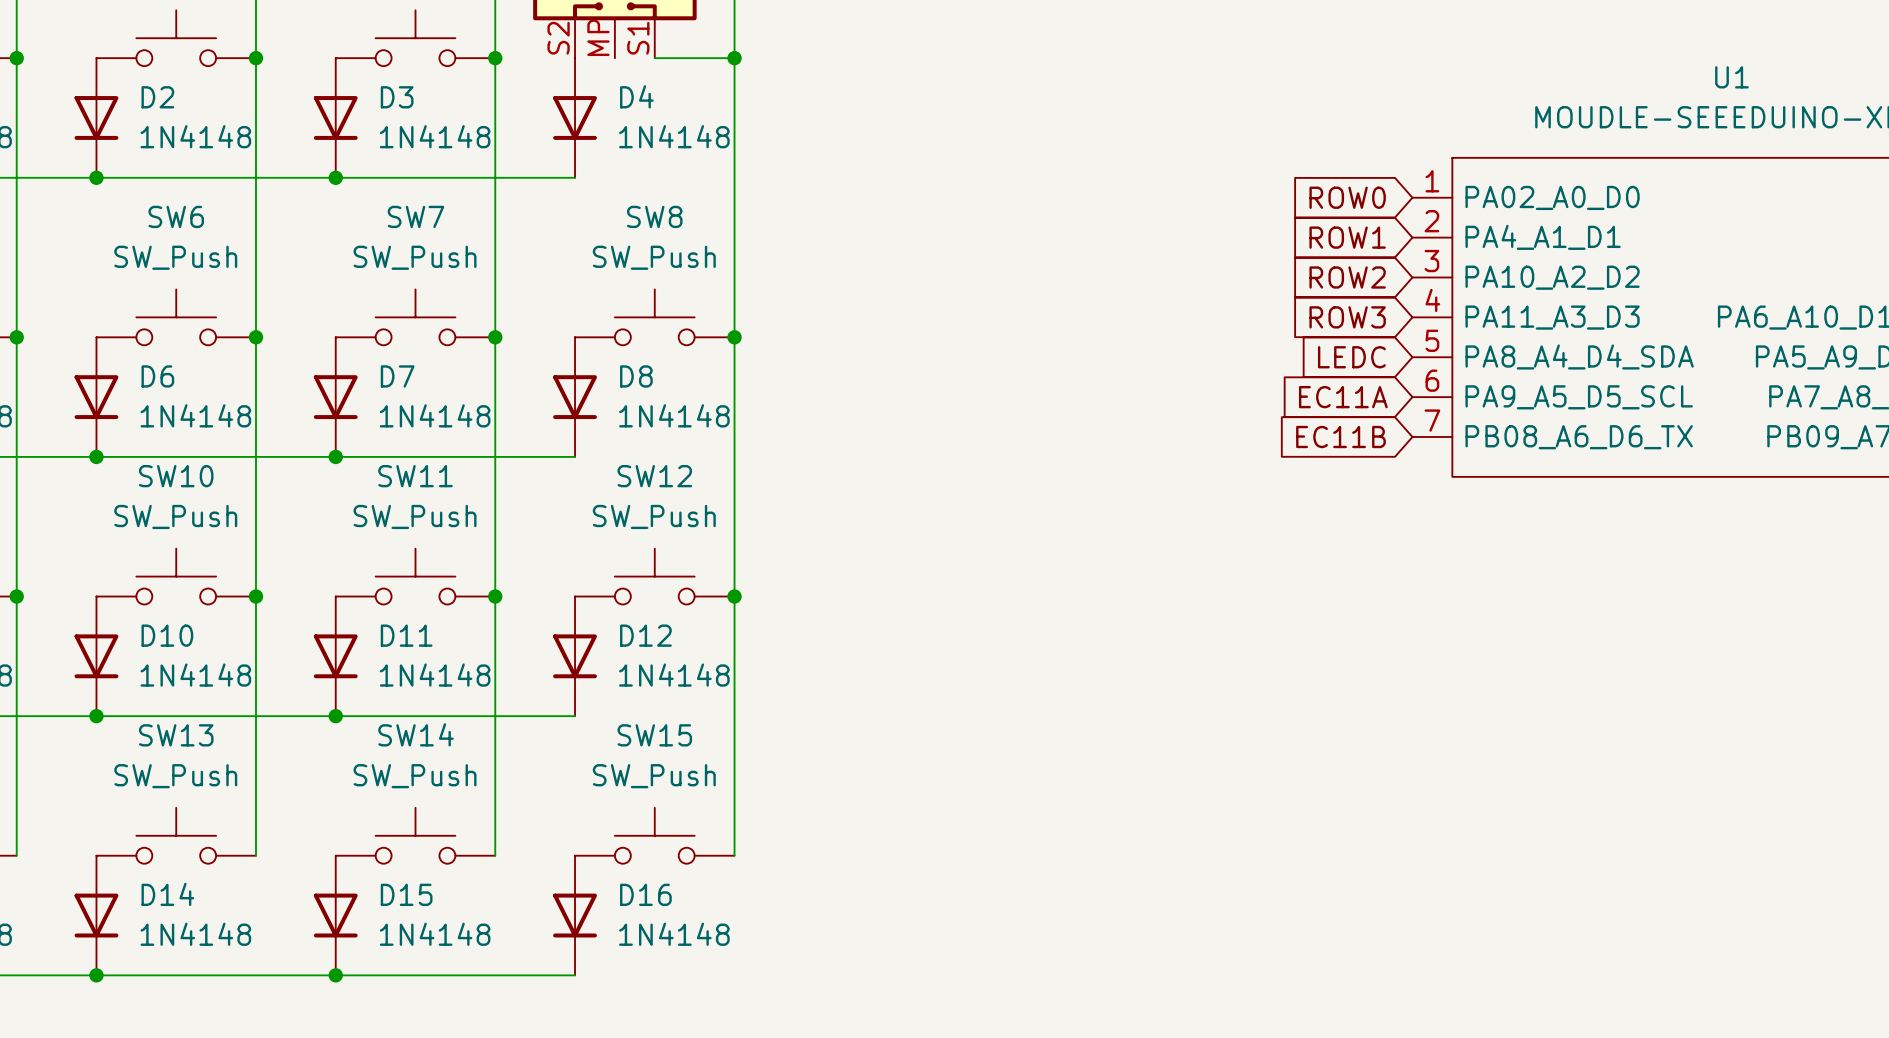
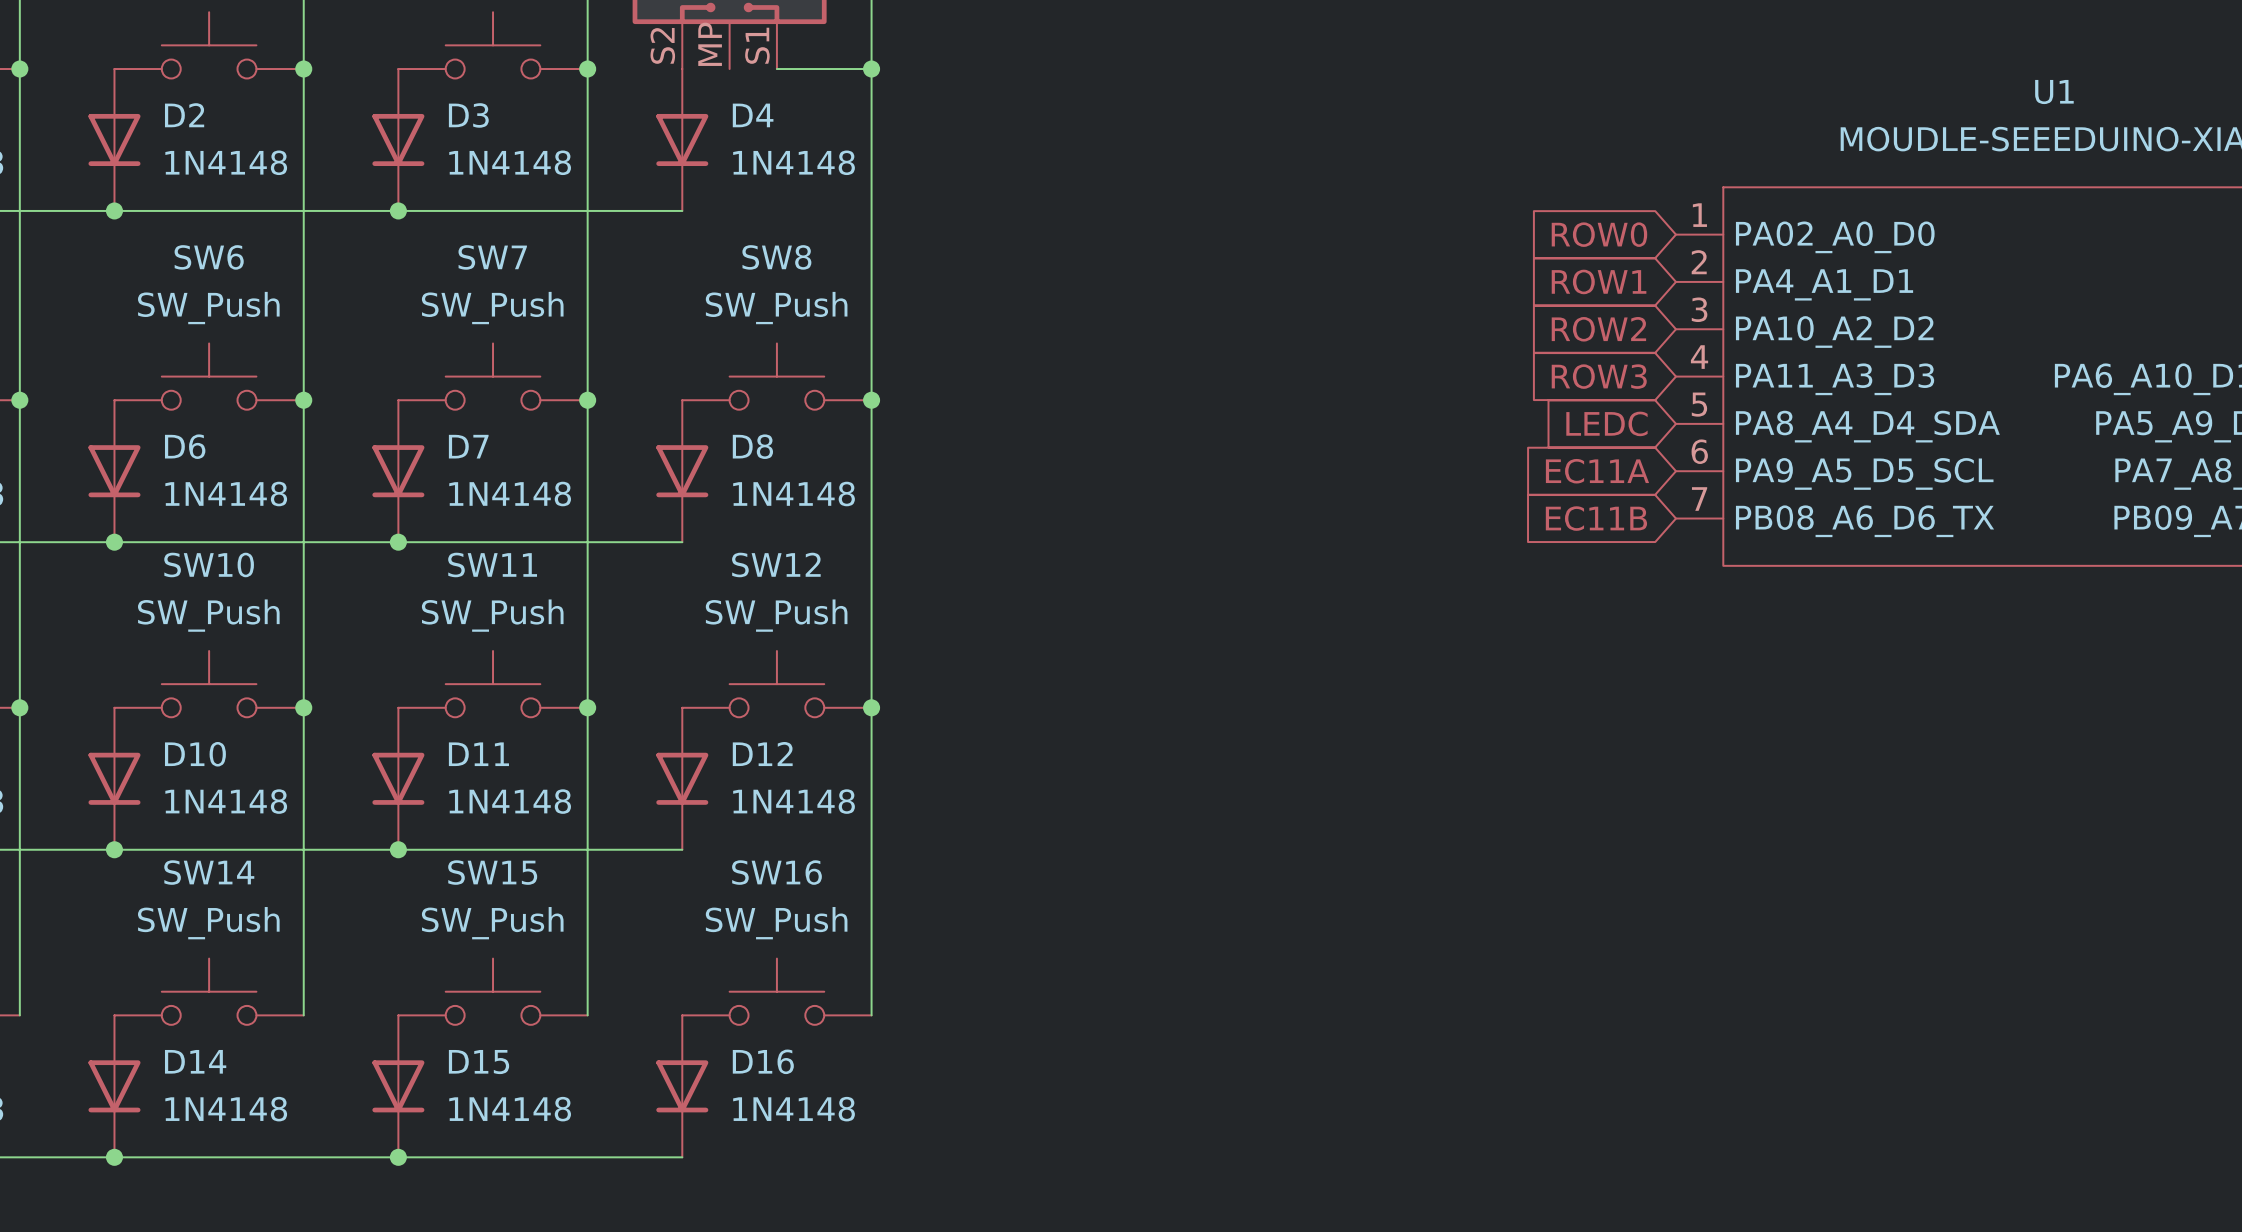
SW14 name: SW14 (415, 734) -> SW15 (492, 872)
SW13 name: SW13 (176, 735) -> SW14 (209, 872)
SW15 name: SW15 (654, 735) -> SW16 (776, 872)

